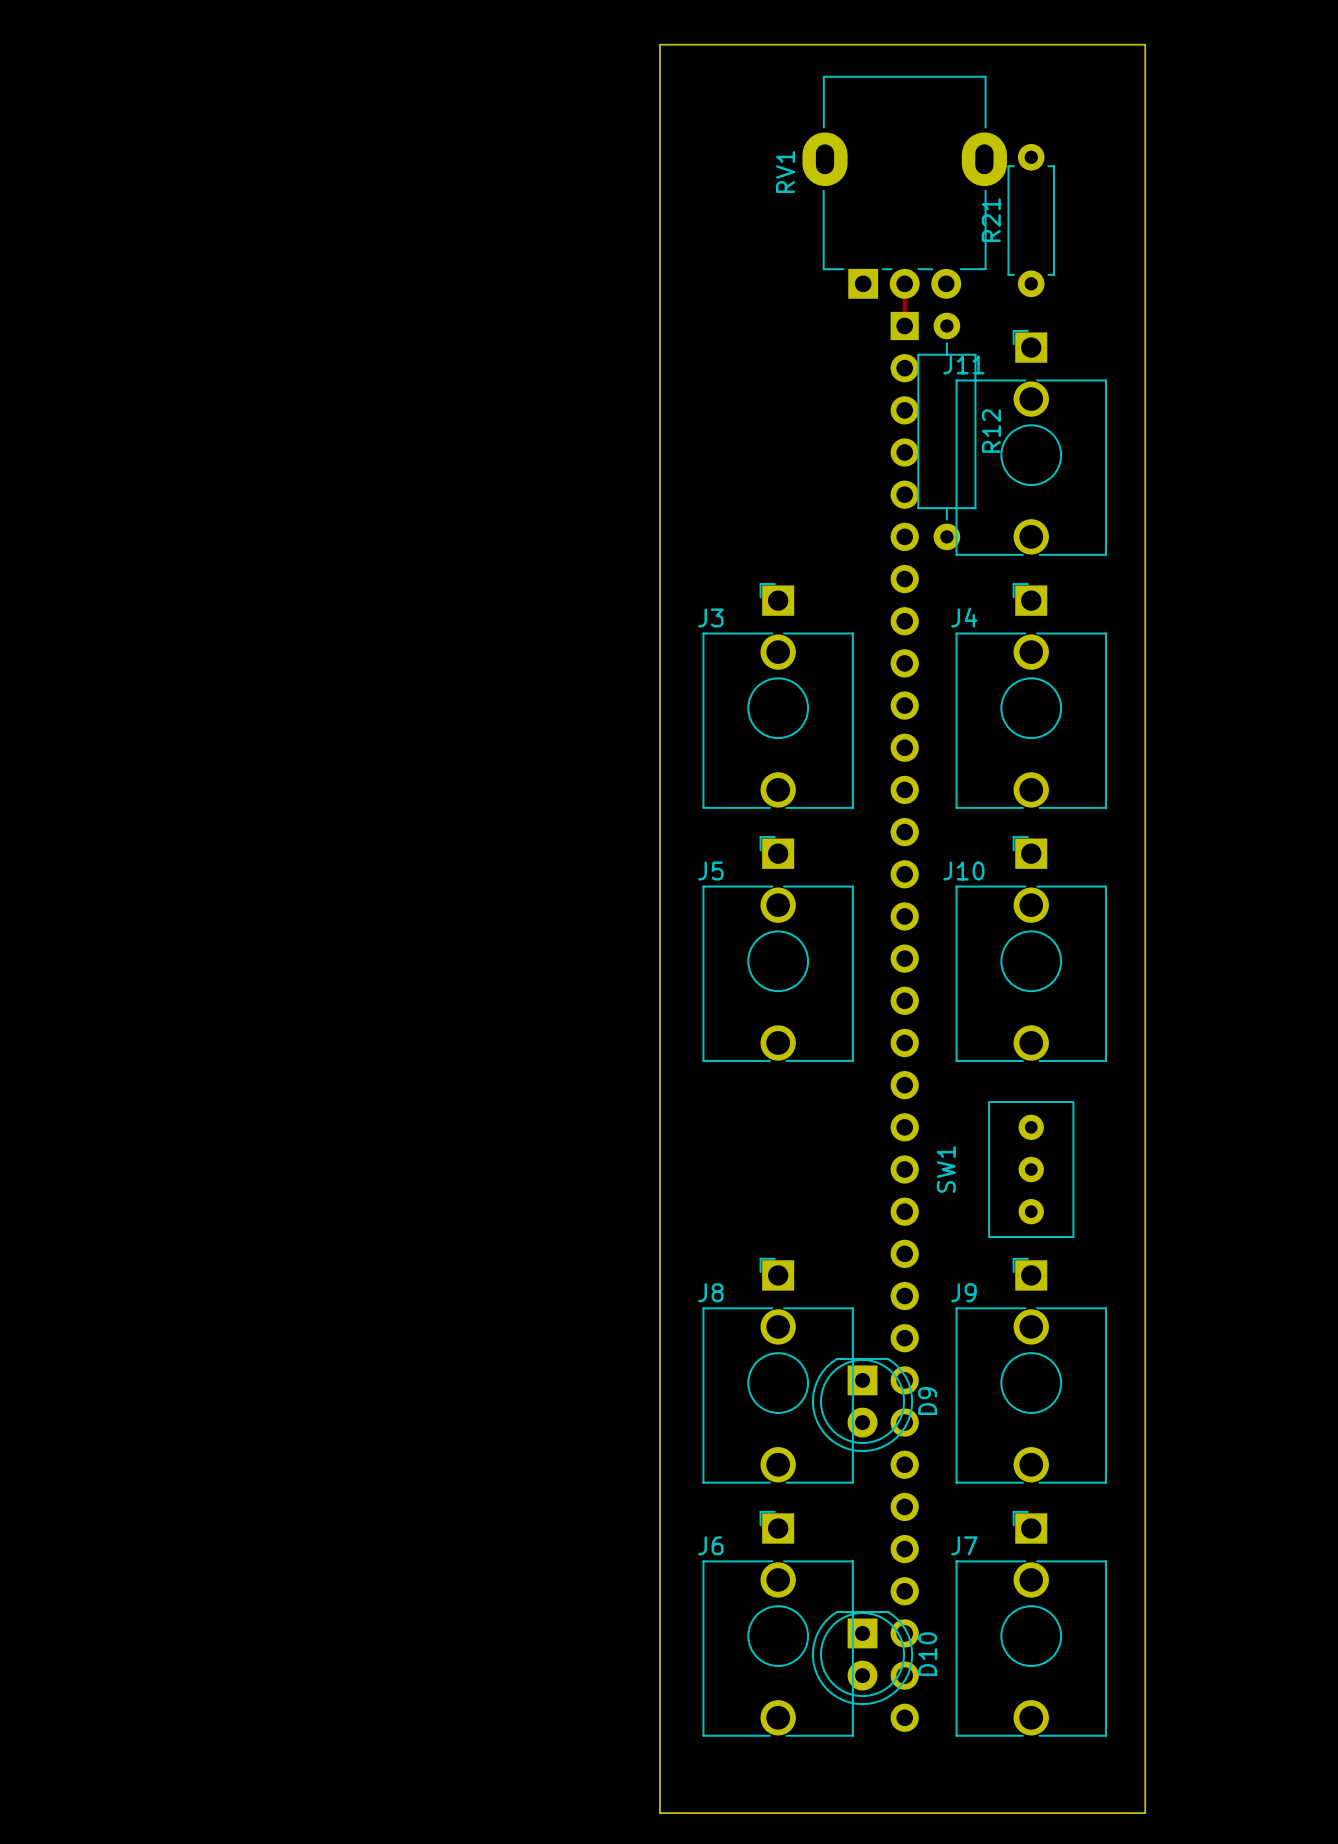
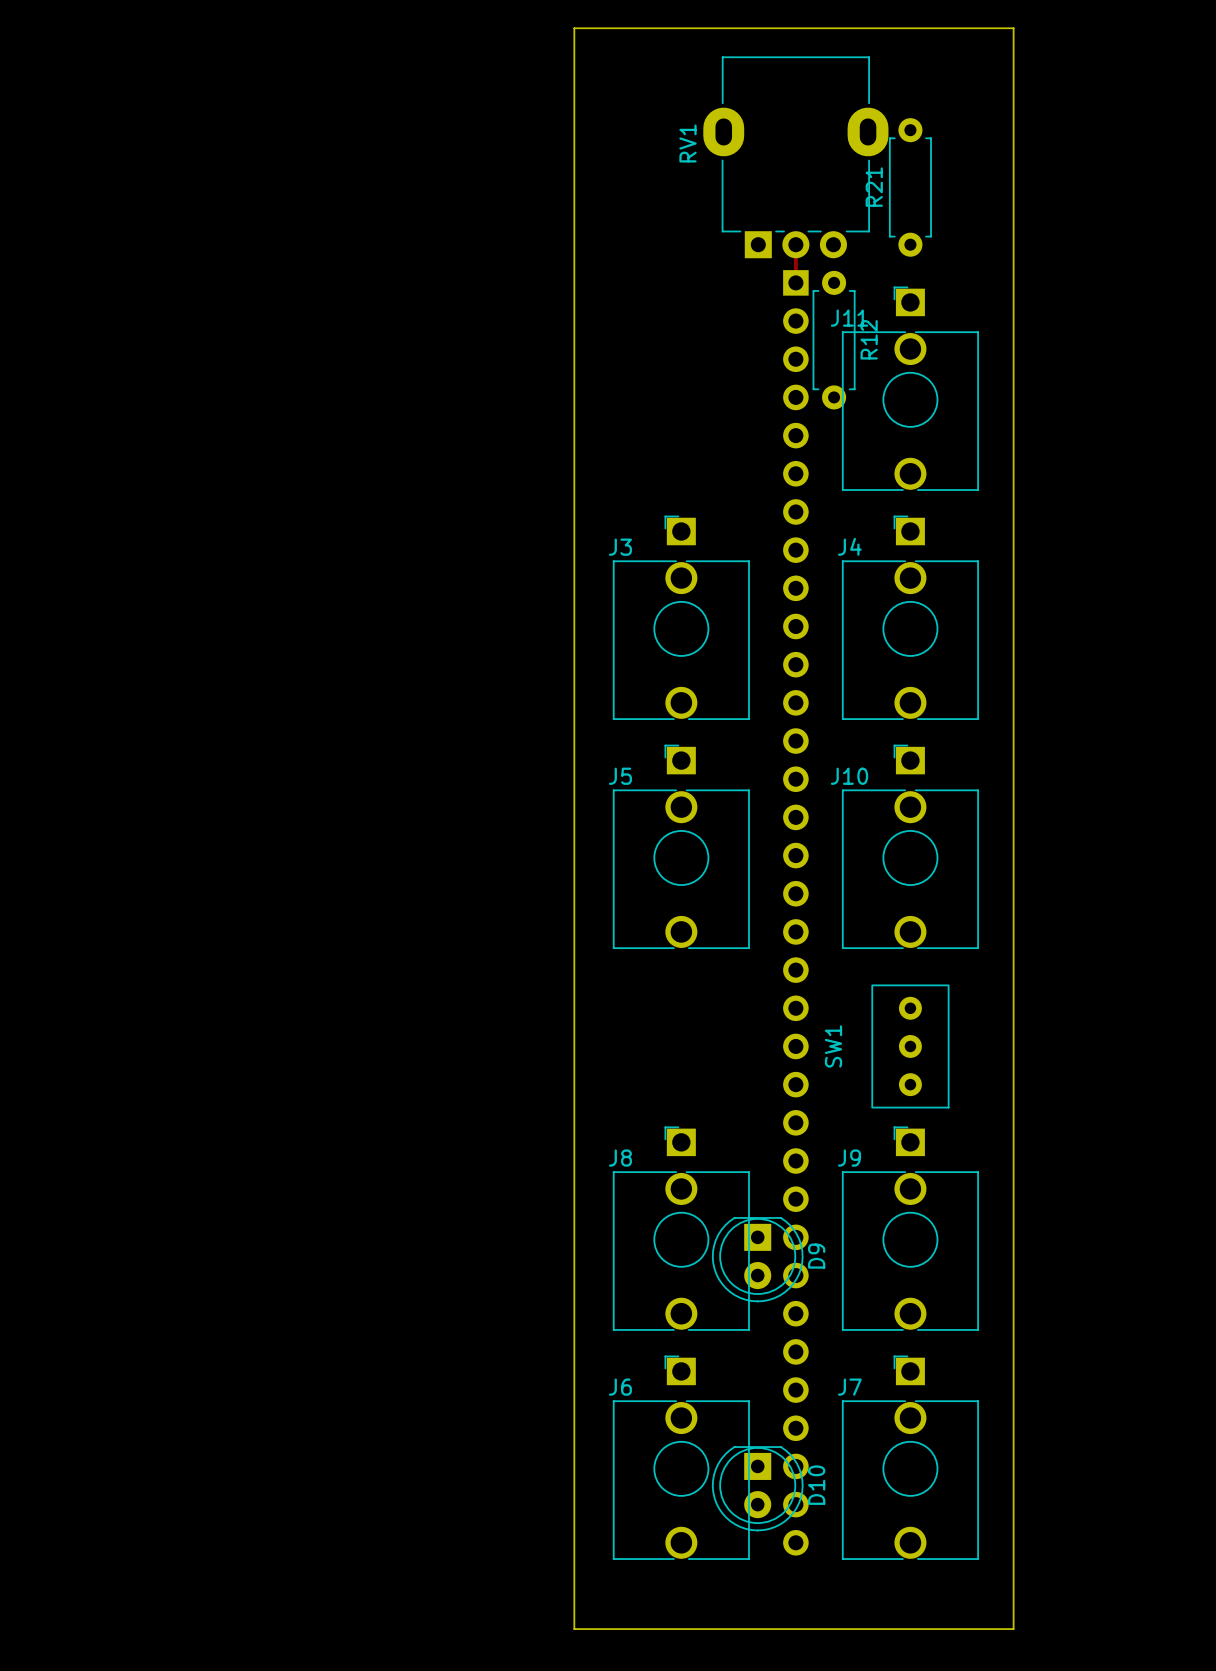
R12 footprint: [917, 312, 977, 551] -> [812, 270, 856, 410]

